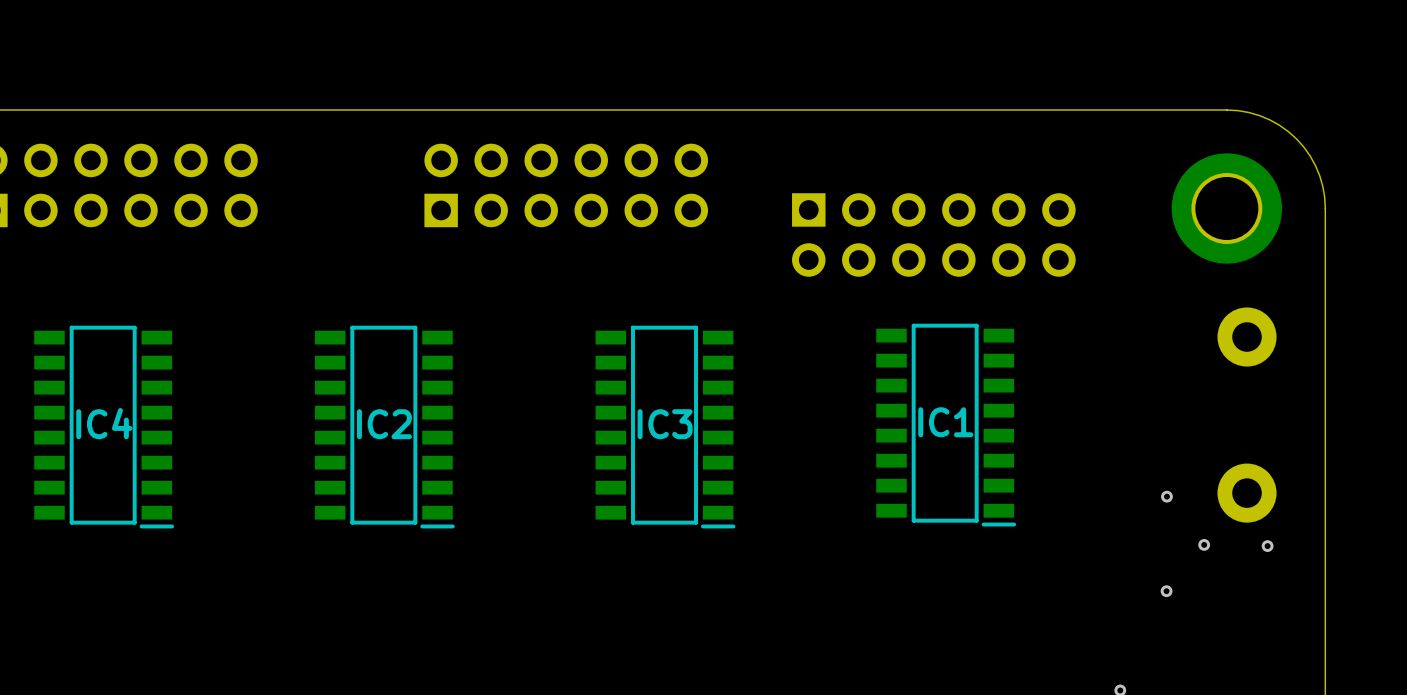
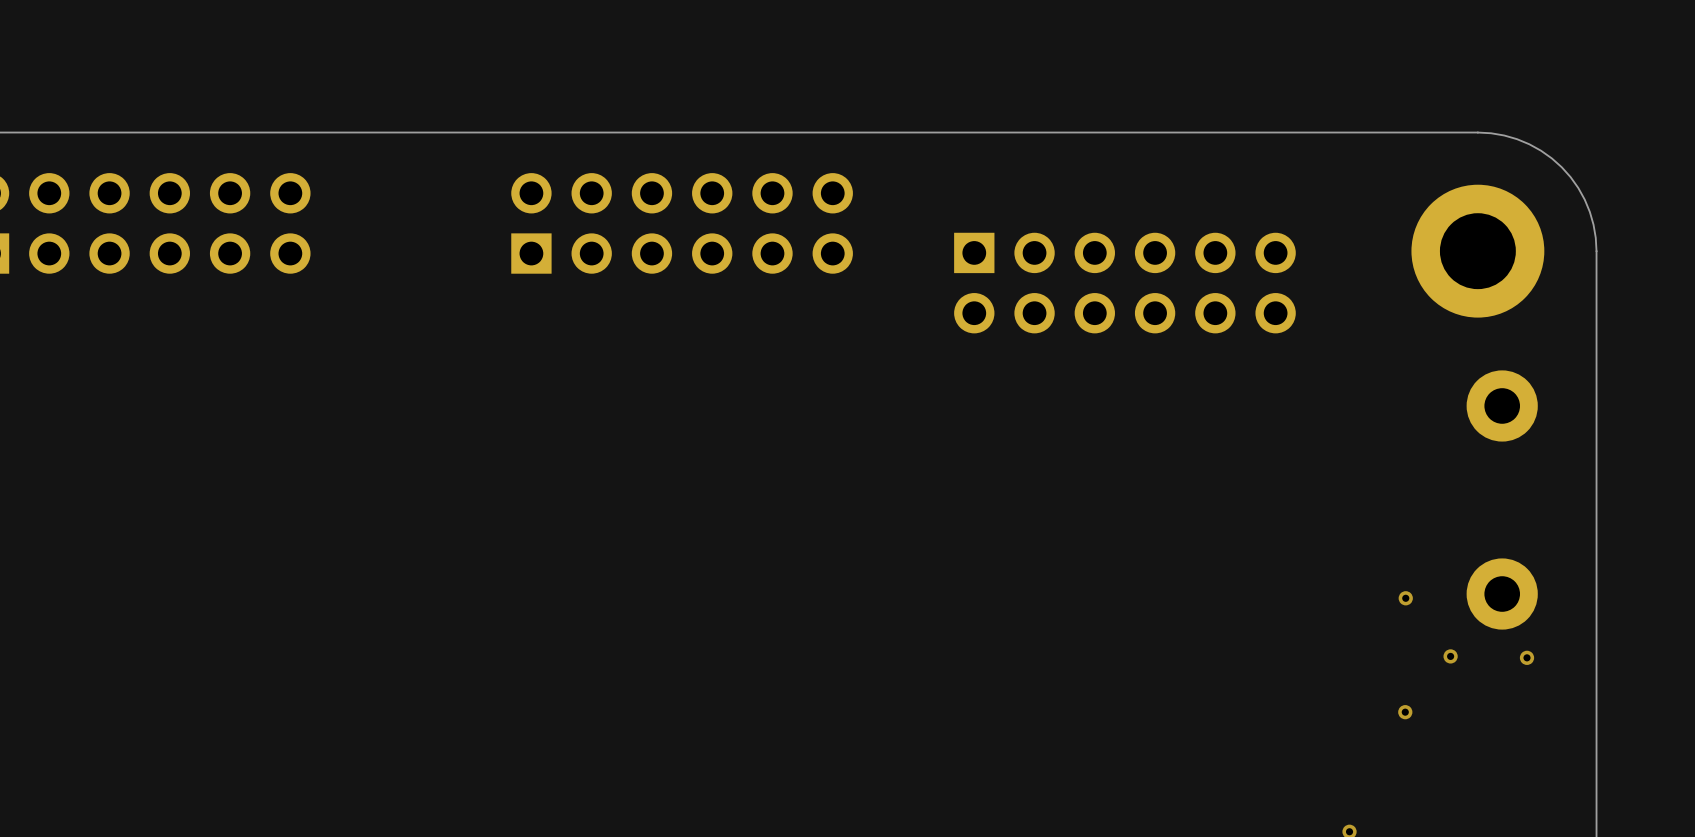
IC1: (946, 425) -> none
IC4: (104, 427) -> none
IC2: (384, 427) -> none
IC3: (665, 427) -> none

